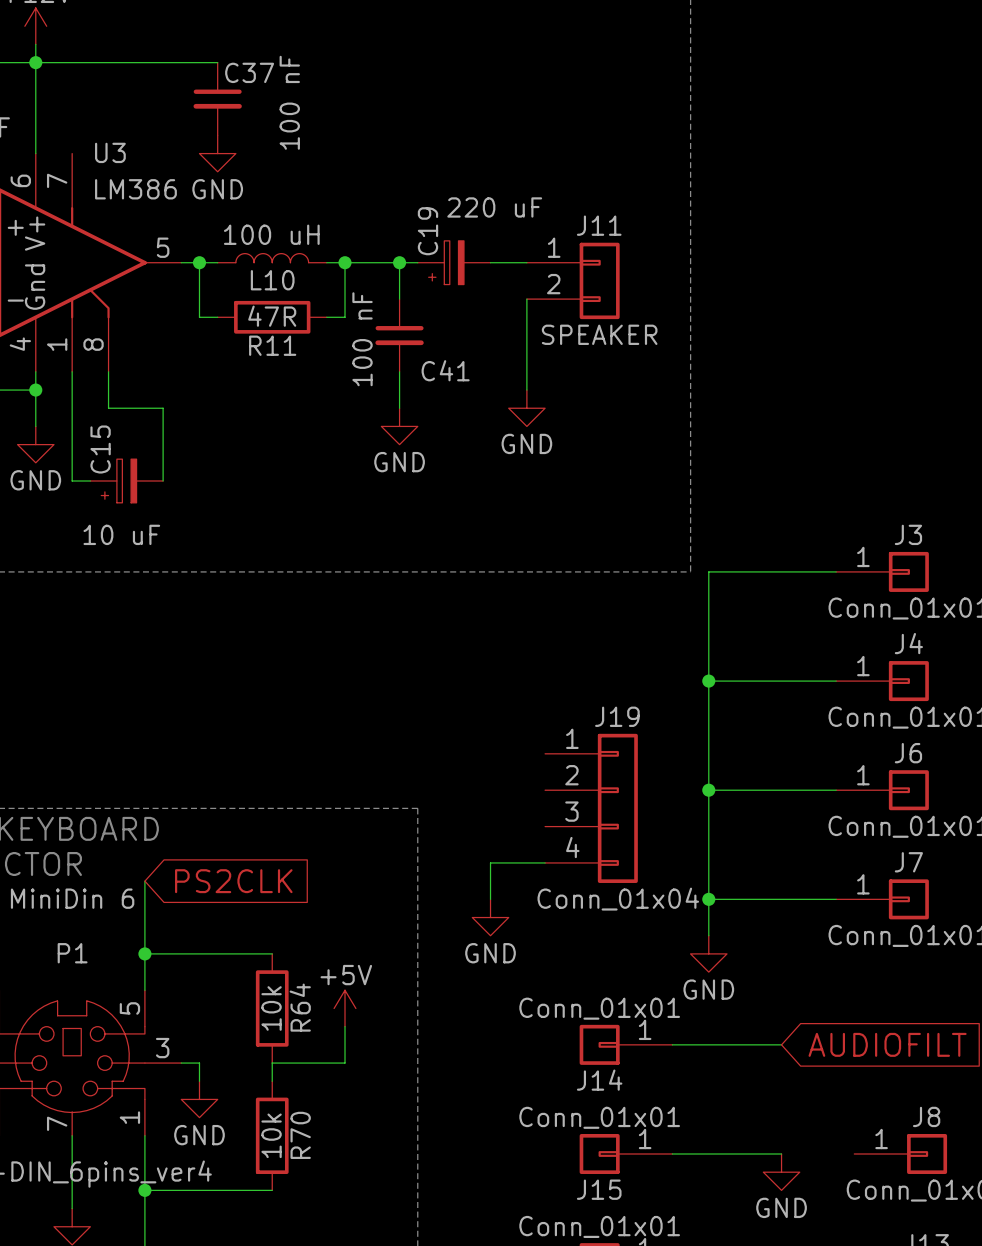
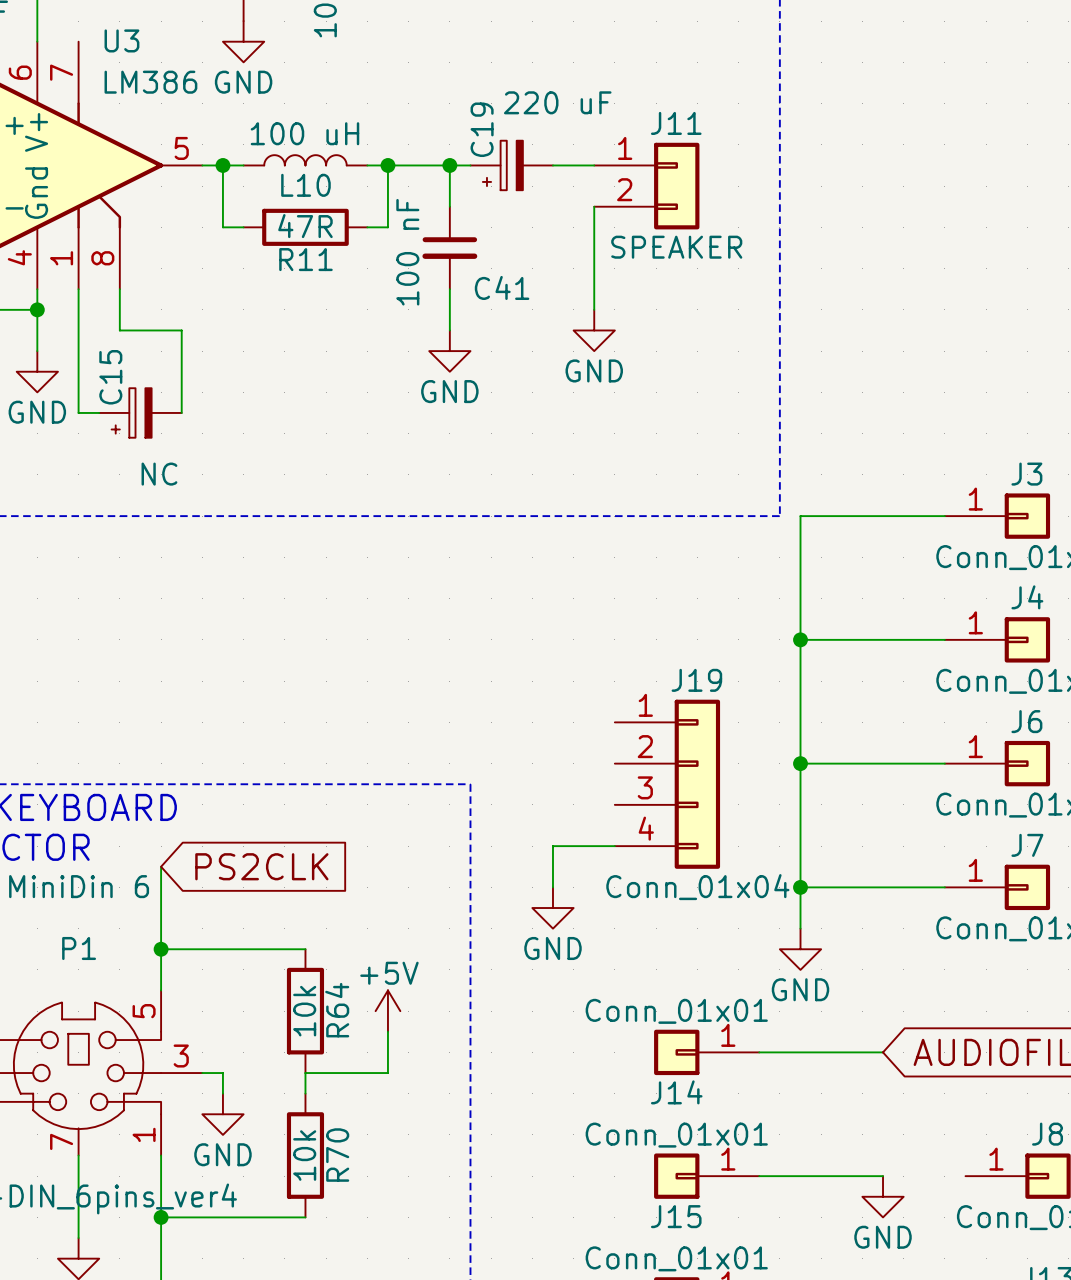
C15 value: 10 uF (121, 534) -> NC (159, 474)

